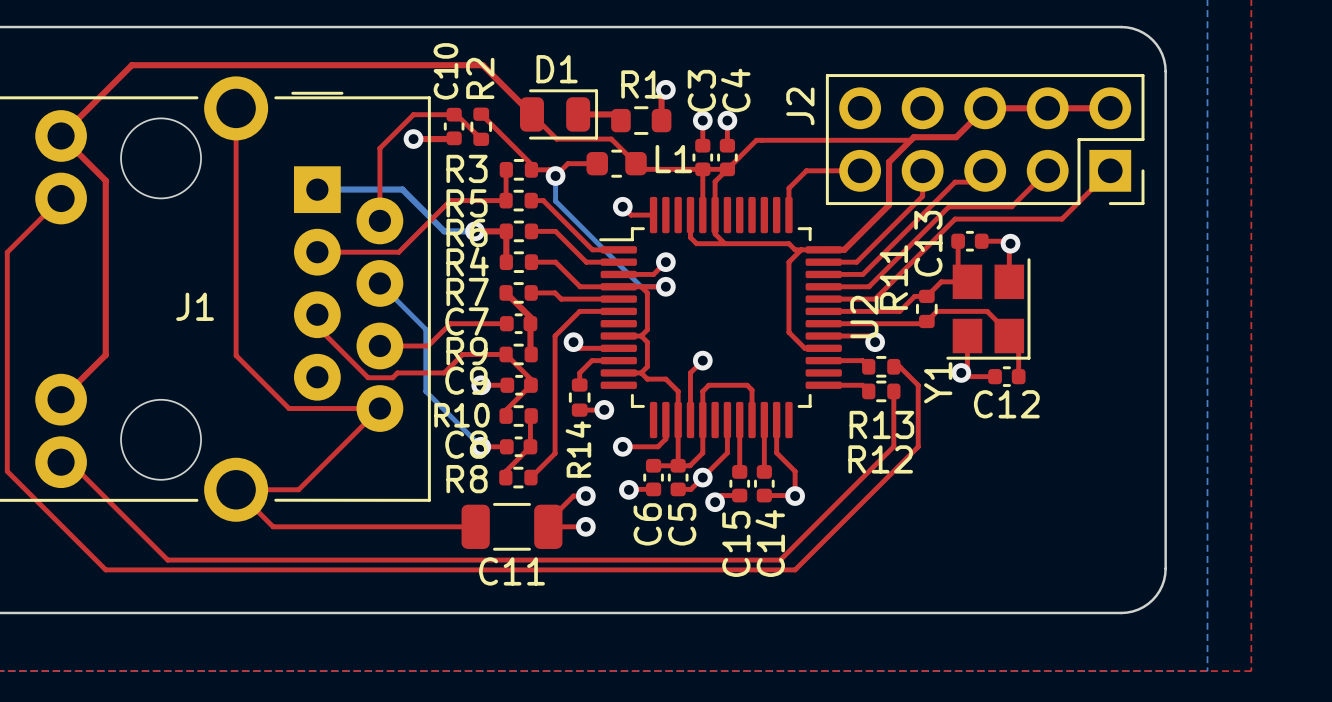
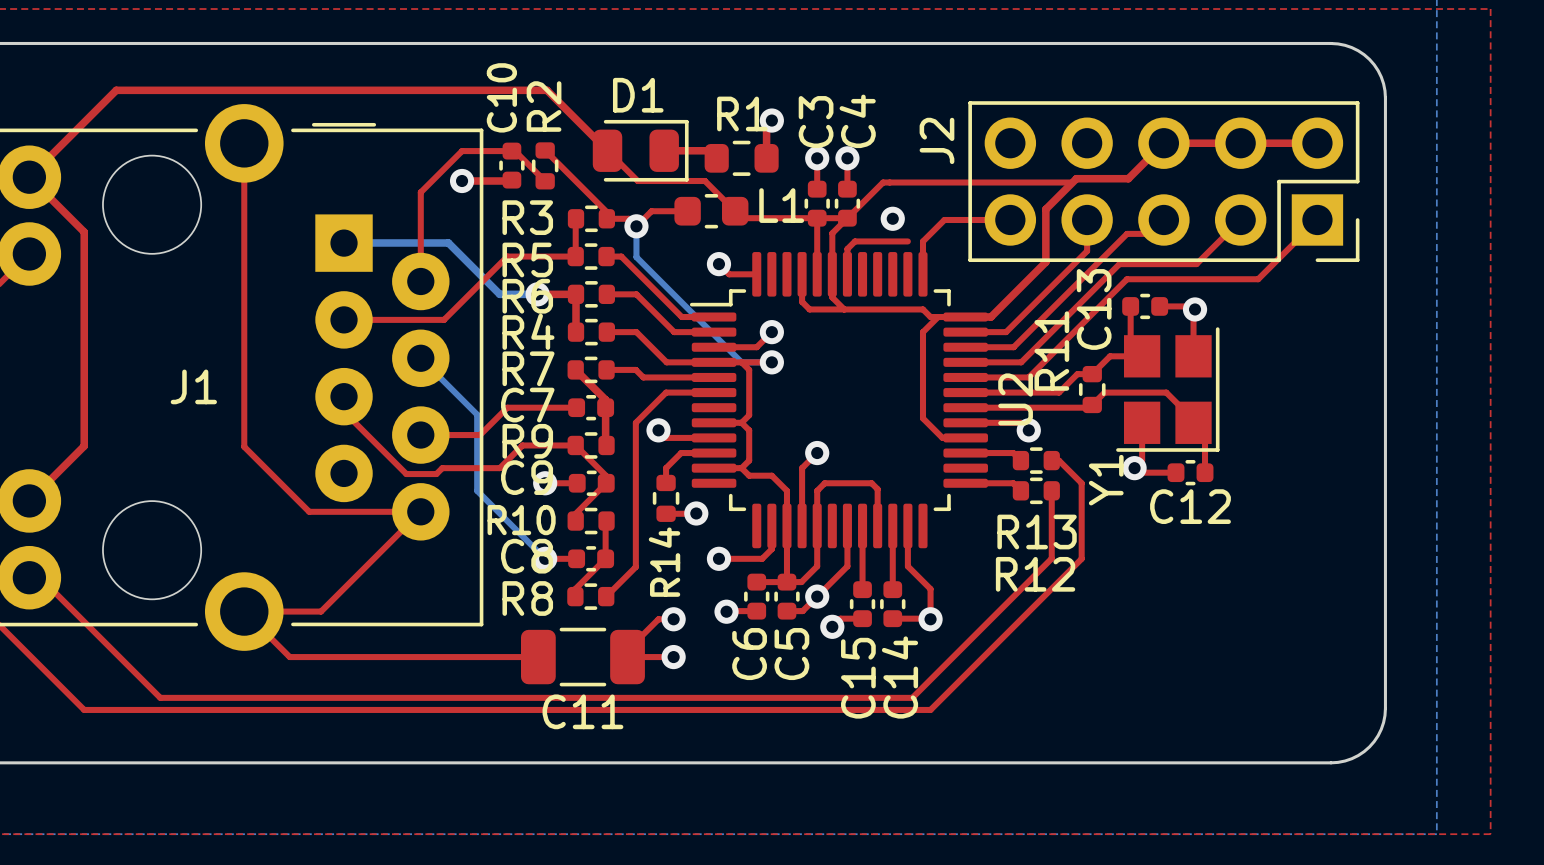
via: none -> (892, 218)
top track: none -> (907, 241) (854, 241) (847, 249) (847, 274)

